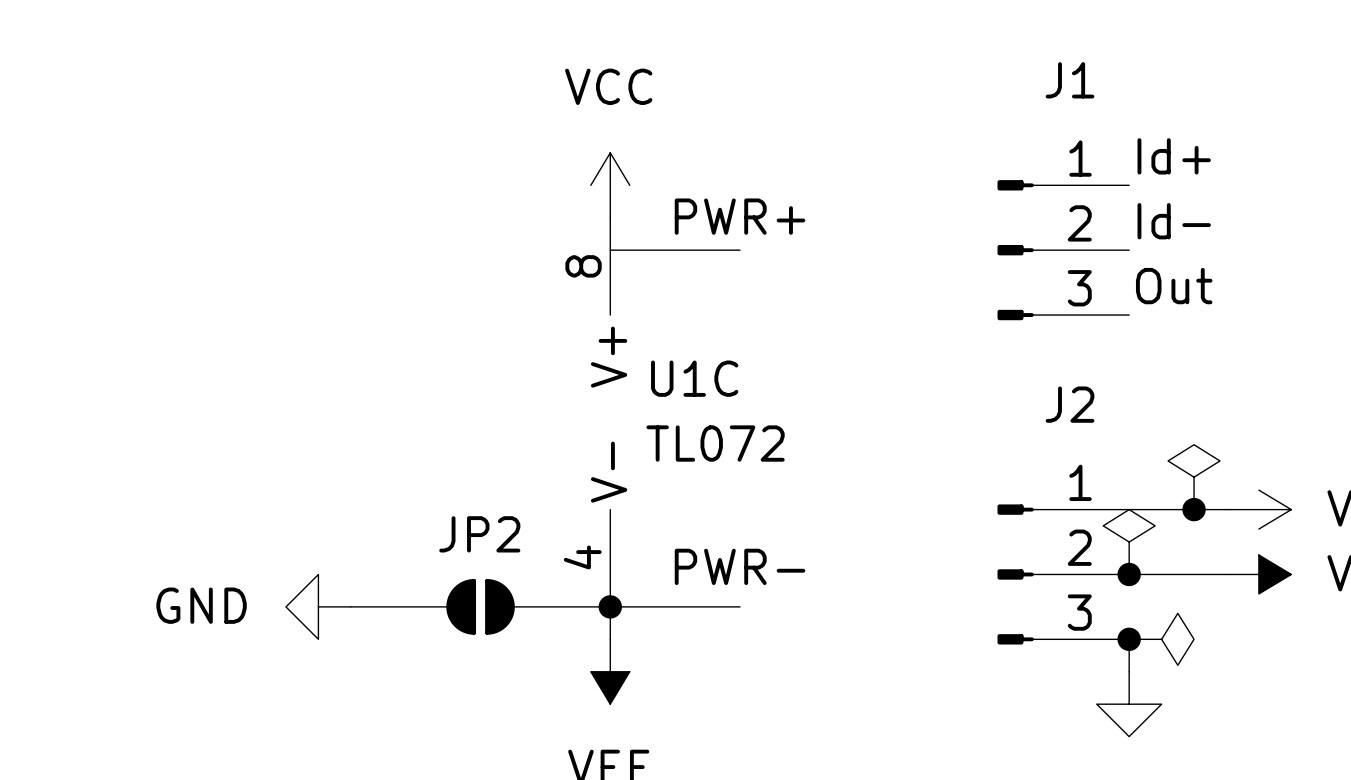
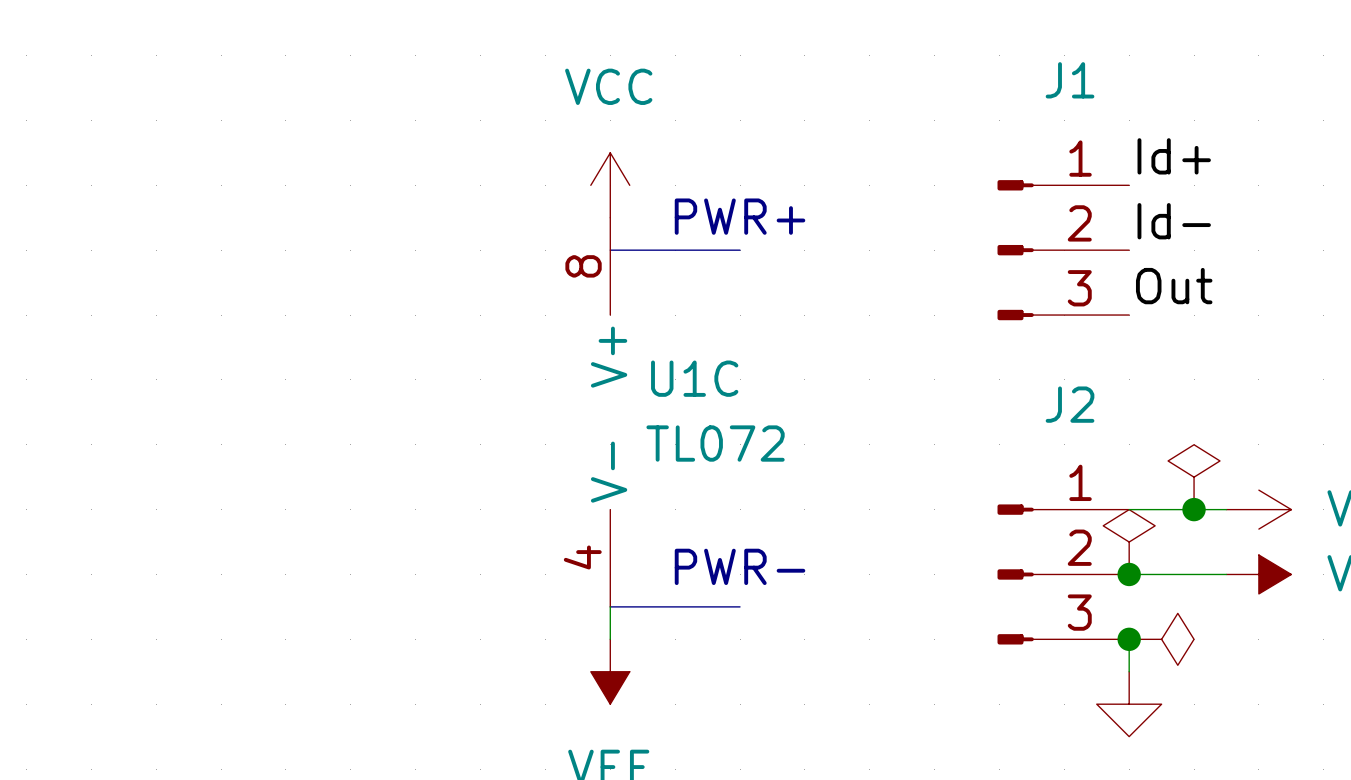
power symbol: GND (318, 606) -> none
JP2: (480, 606) -> none
junction: (610, 606) -> none

